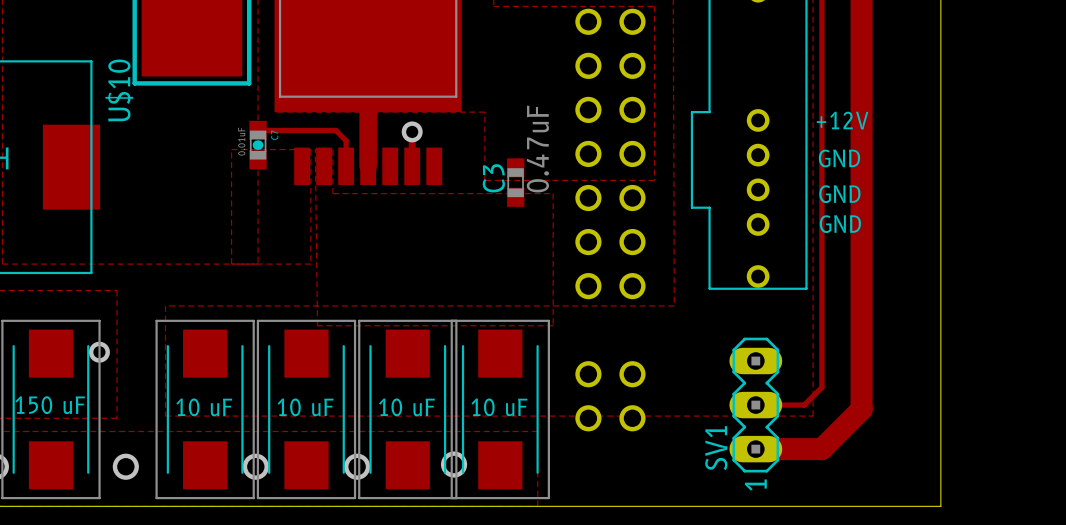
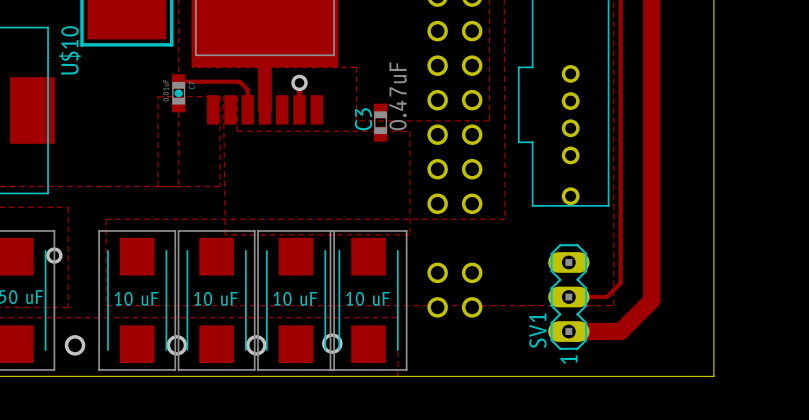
text: +12V (842, 120) -> none
text: GND (839, 158) -> none
text: GND (839, 194) -> none
text: GND (840, 224) -> none

